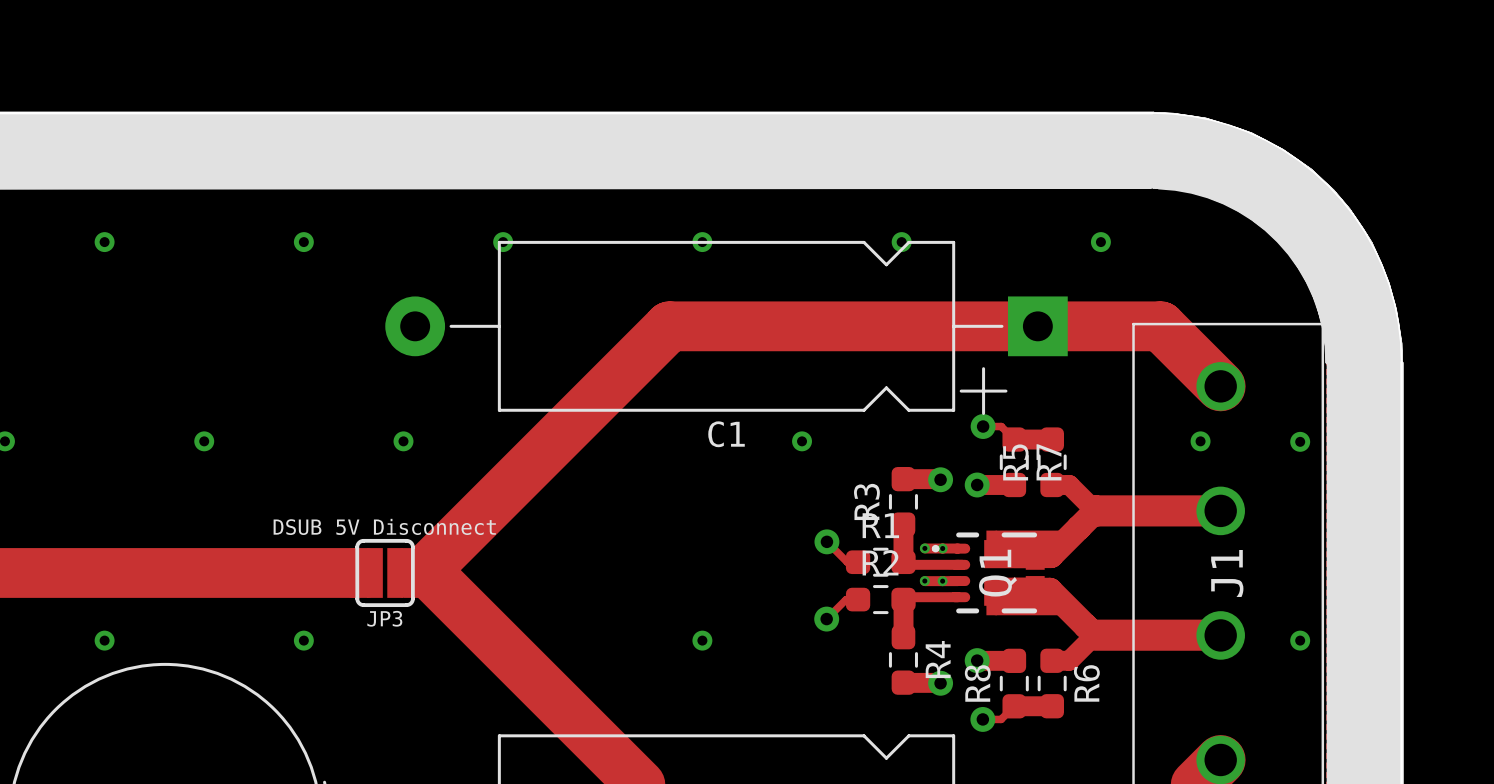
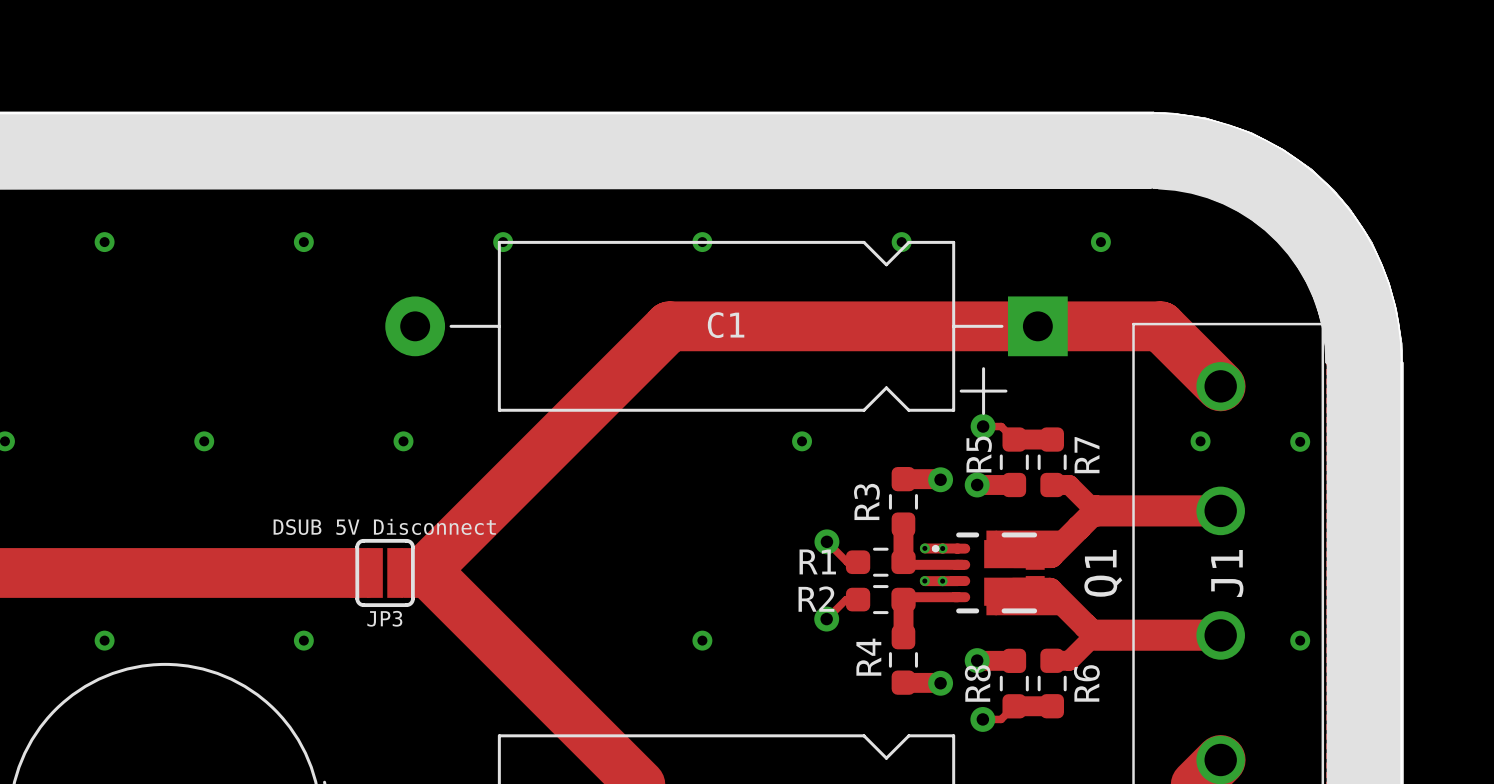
C1 name position: C1 (726, 434) -> C1 (726, 325)
R5 name position: R5 (1015, 462) -> R5 (979, 454)
R7 name position: R7 (1048, 462) -> R7 (1087, 455)
R1 name position: R1 (880, 525) -> R1 (817, 561)
R2 name position: R2 (880, 562) -> R2 (816, 599)
Q1 name position: Q1 (998, 573) -> Q1 (1103, 573)
R4 name position: R4 (938, 659) -> R4 (868, 657)

